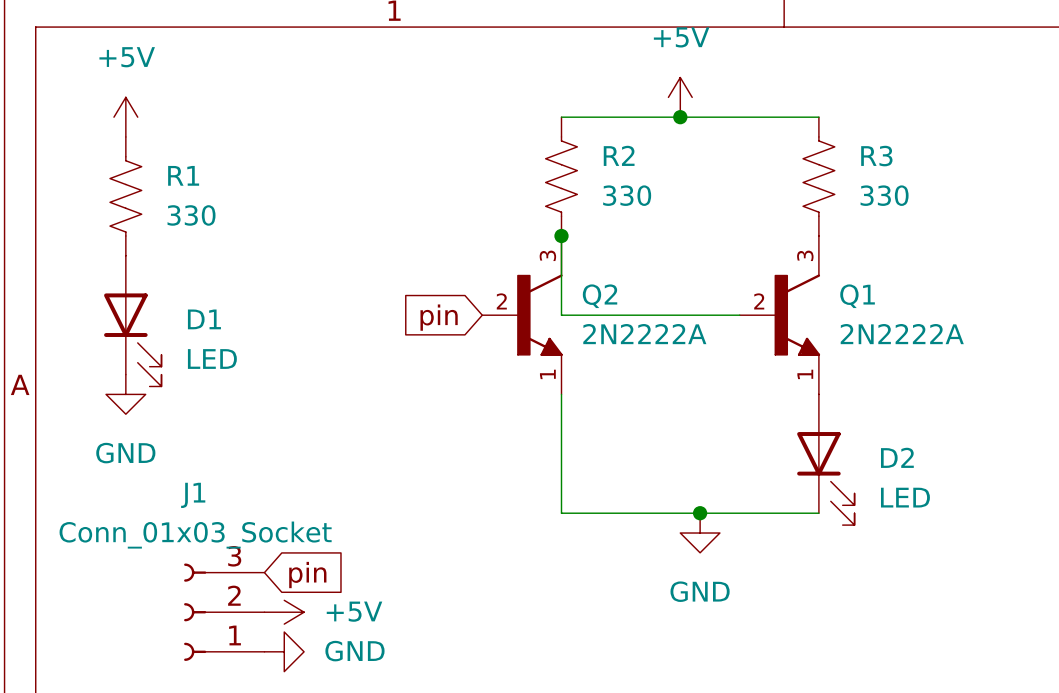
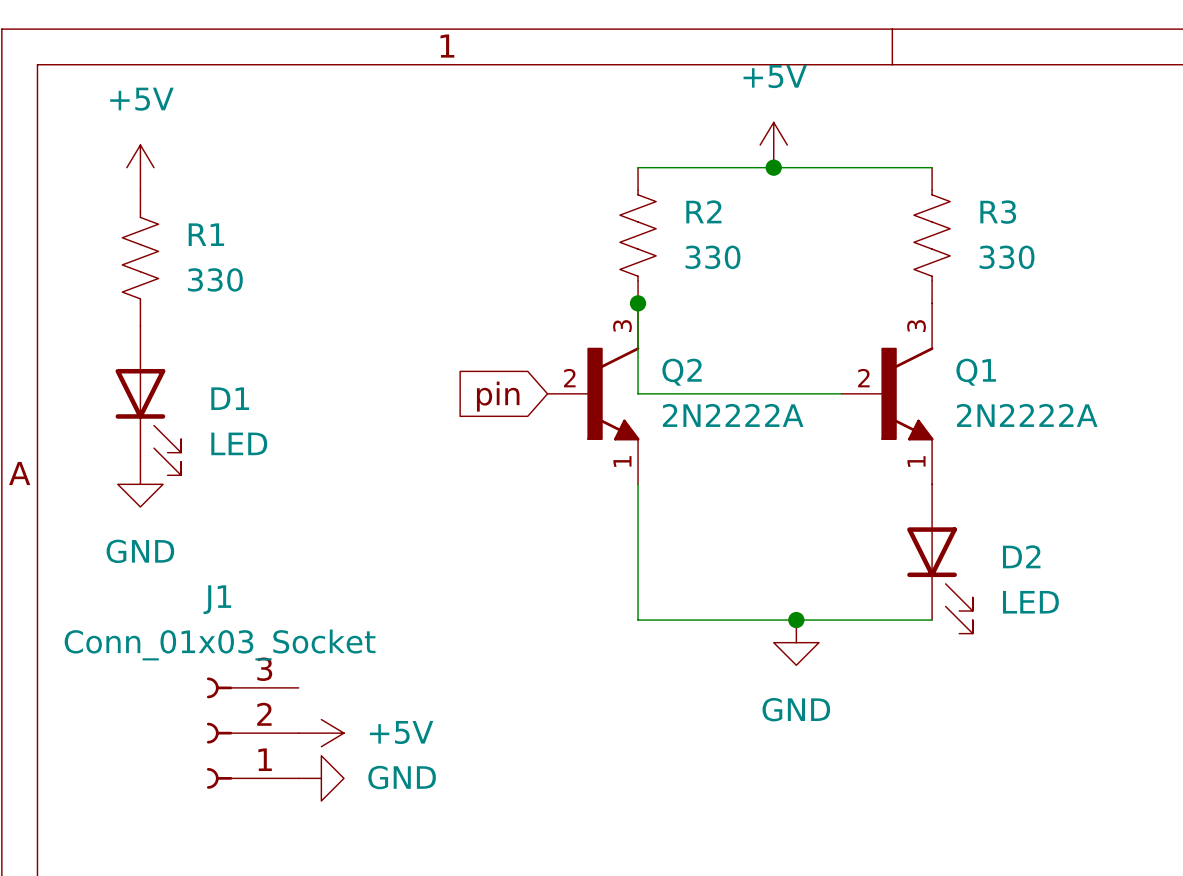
global label: pin (307, 575) -> none

